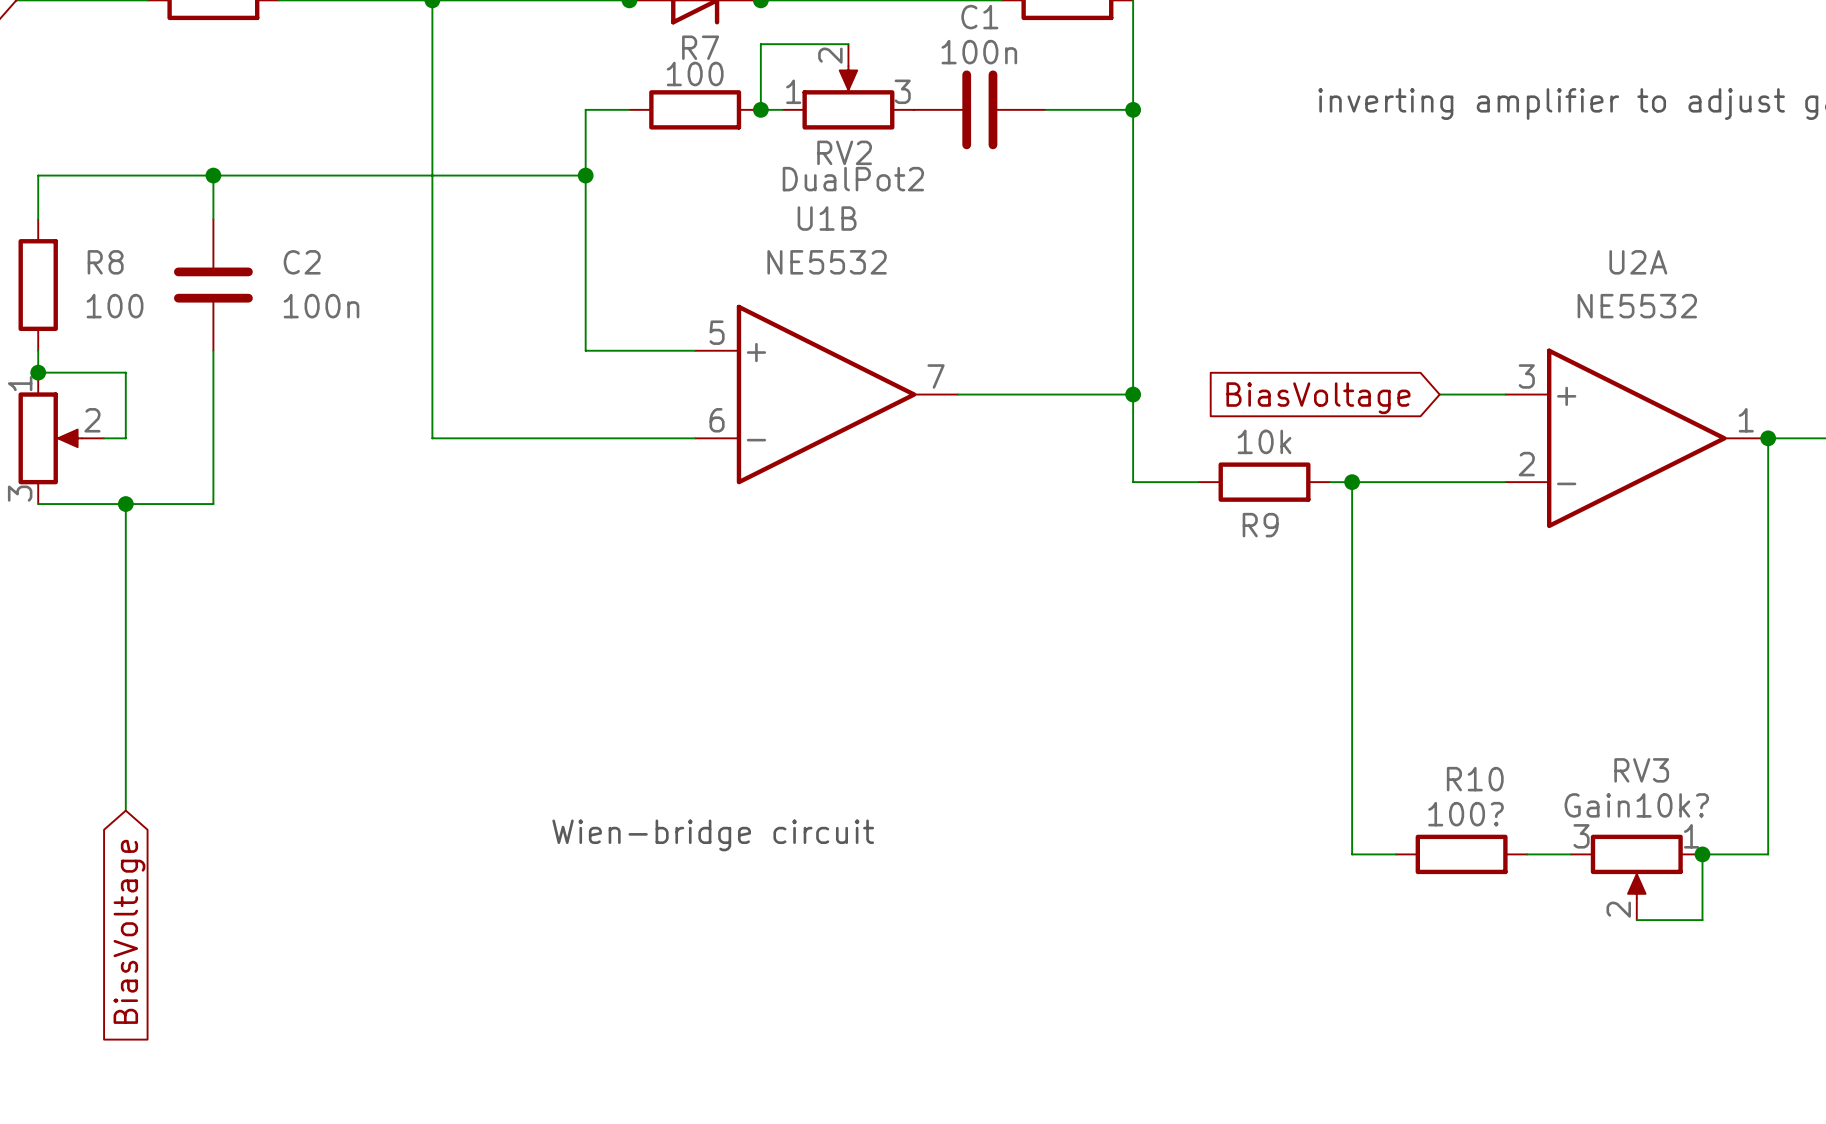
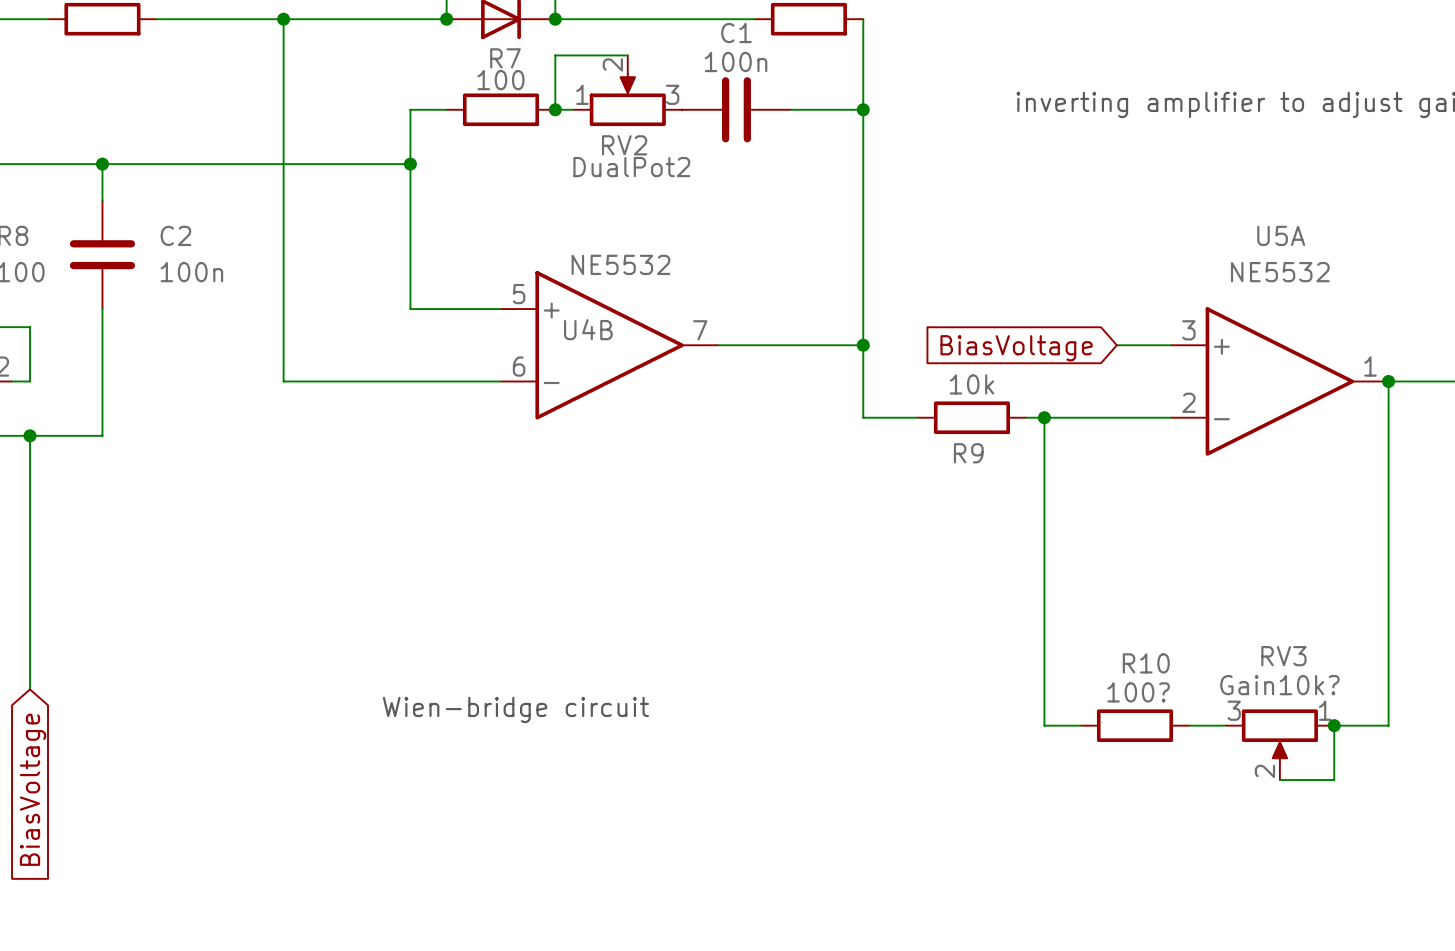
U1B name: U1B (827, 218) -> U4B (588, 329)
U1B value position: NE5532 (827, 262) -> NE5532 (620, 264)
U2A name: U2A (1638, 262) -> U5A (1281, 235)

